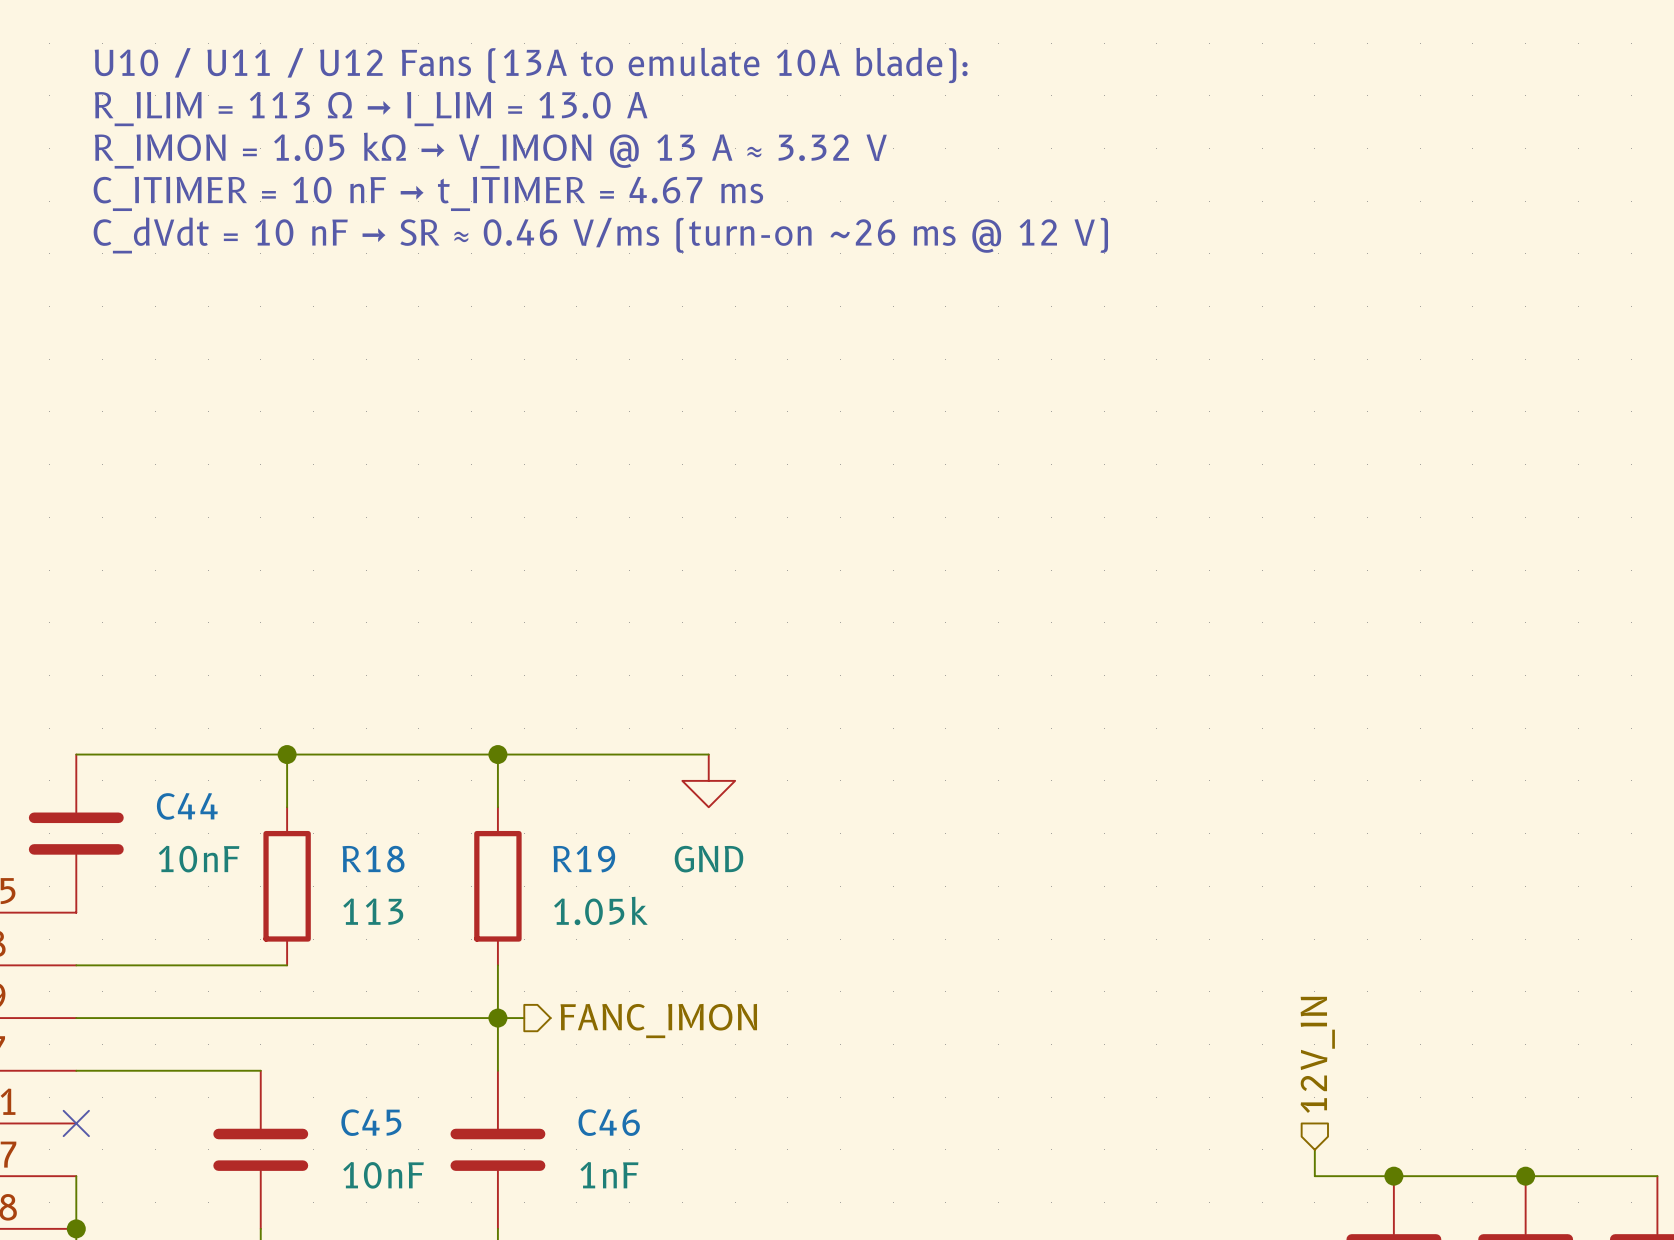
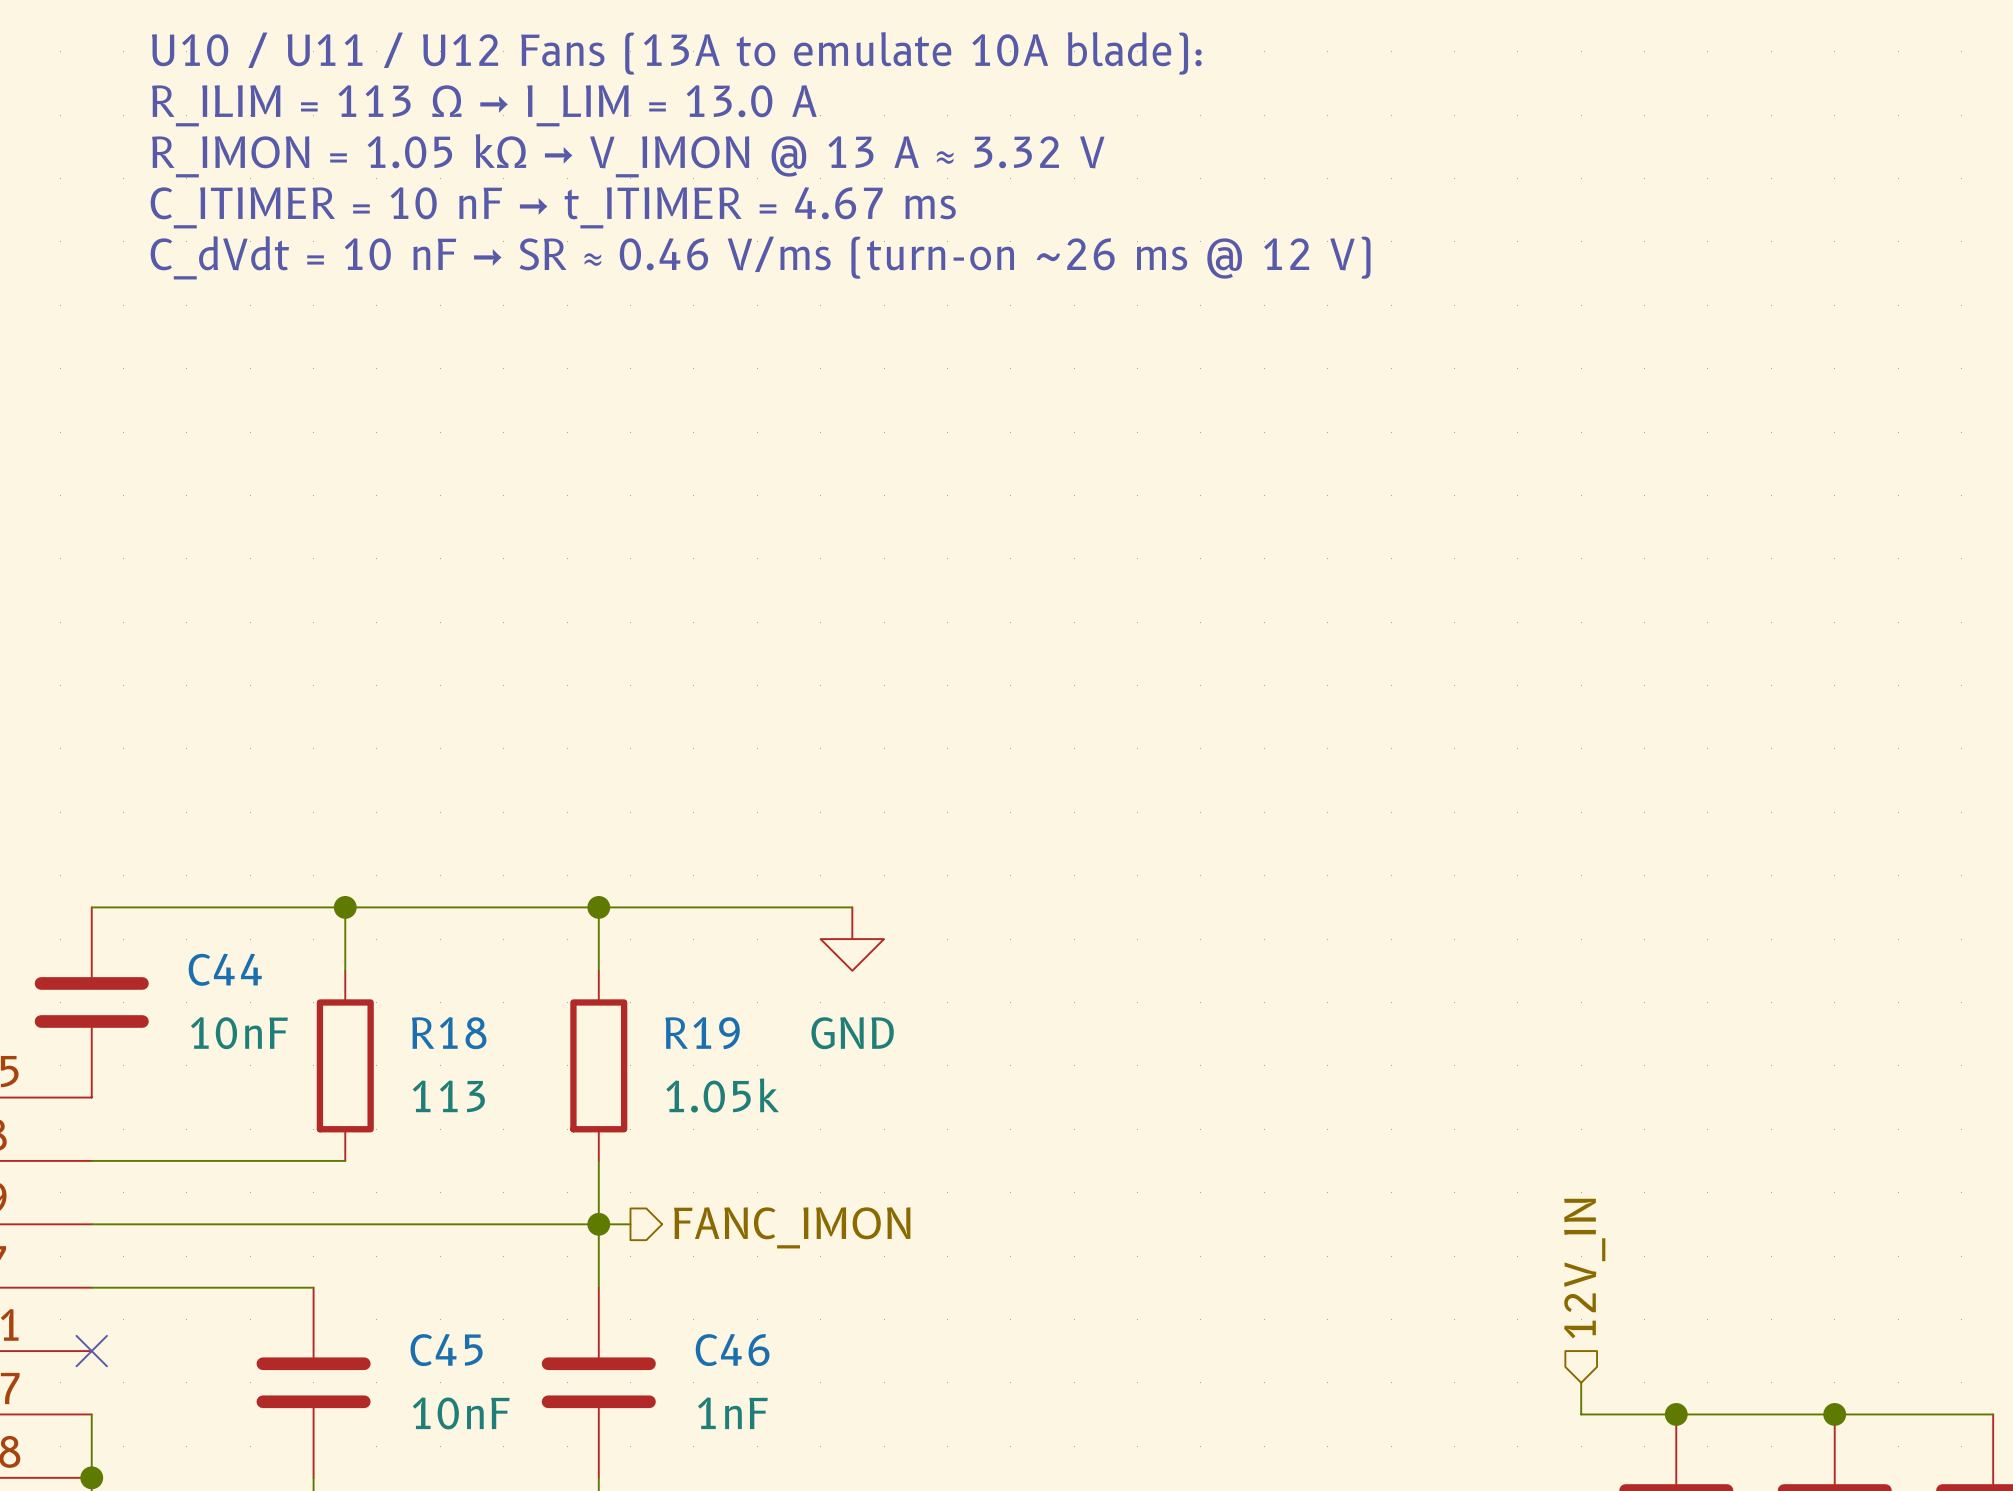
text position: U10 / U11 / U12 Fans (13A to emulate 10A blade): (531, 65) -> U10 / U11 / U12 Fans (13A to emulate 10A blade): (676, 53)
text position: R_ILIM = 113 Ω → I_LIM = 13.0 A (371, 109) -> R_ILIM = 113 Ω → I_LIM = 13.0 A (484, 105)
text position: R_IMON = 1.05 kΩ → V_IMON @ 13 A ≈ 3.32 V (490, 150) -> R_IMON = 1.05 kΩ → V_IMON @ 13 A ≈ 3.32 V (628, 155)
text position: C_ITIMER = 10 nF → t_ITIMER = 4.67 ms (428, 193) -> C_ITIMER = 10 nF → t_ITIMER = 4.67 ms (553, 207)
text position: C_dVdt = 10 nF → SR ≈ 0.46 V/ms (turn-on ~26 ms @ 12 V) (600, 235) -> C_dVdt = 10 nF → SR ≈ 0.46 V/ms (turn-on ~26 ms @ 12 V) (760, 257)

